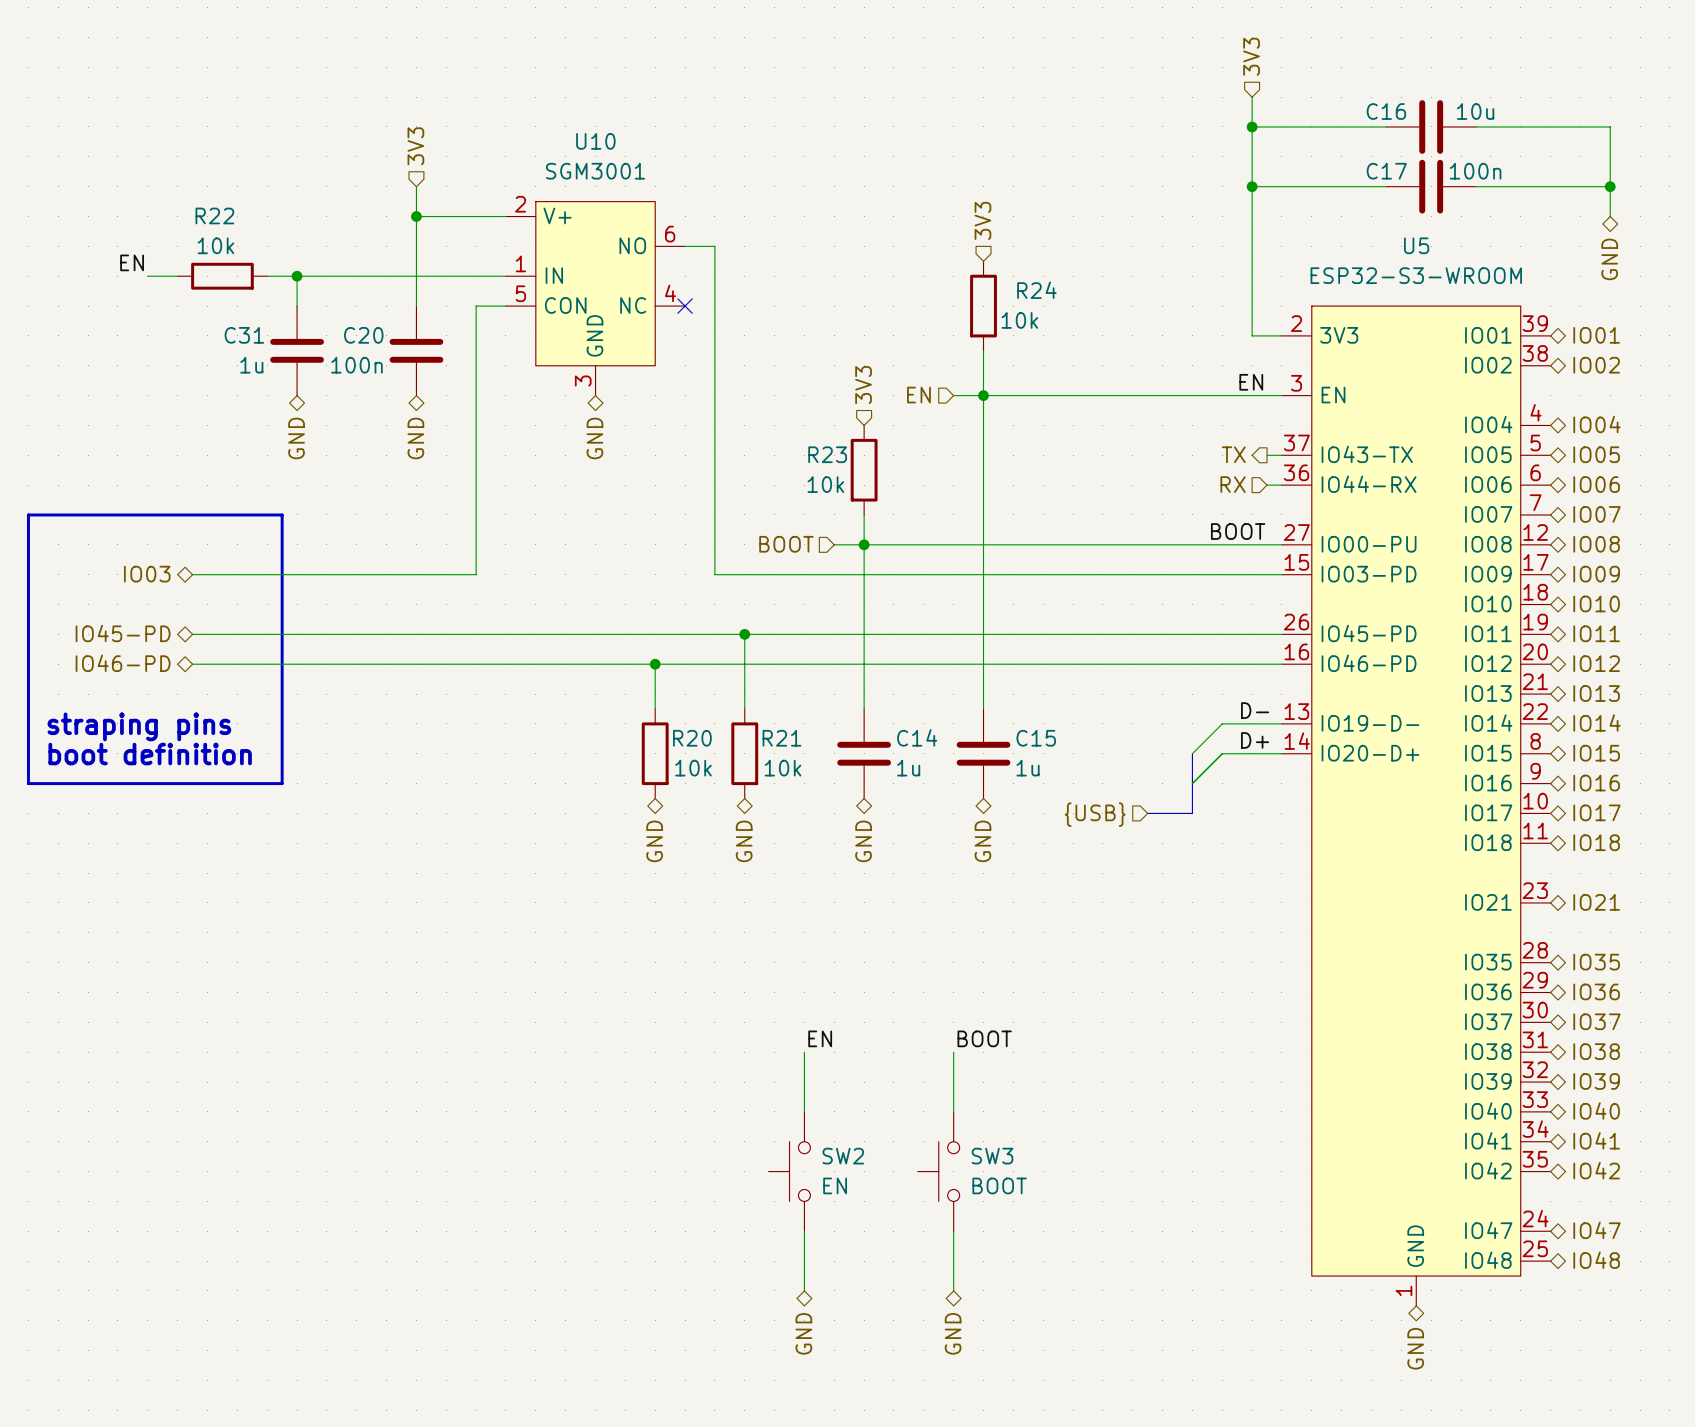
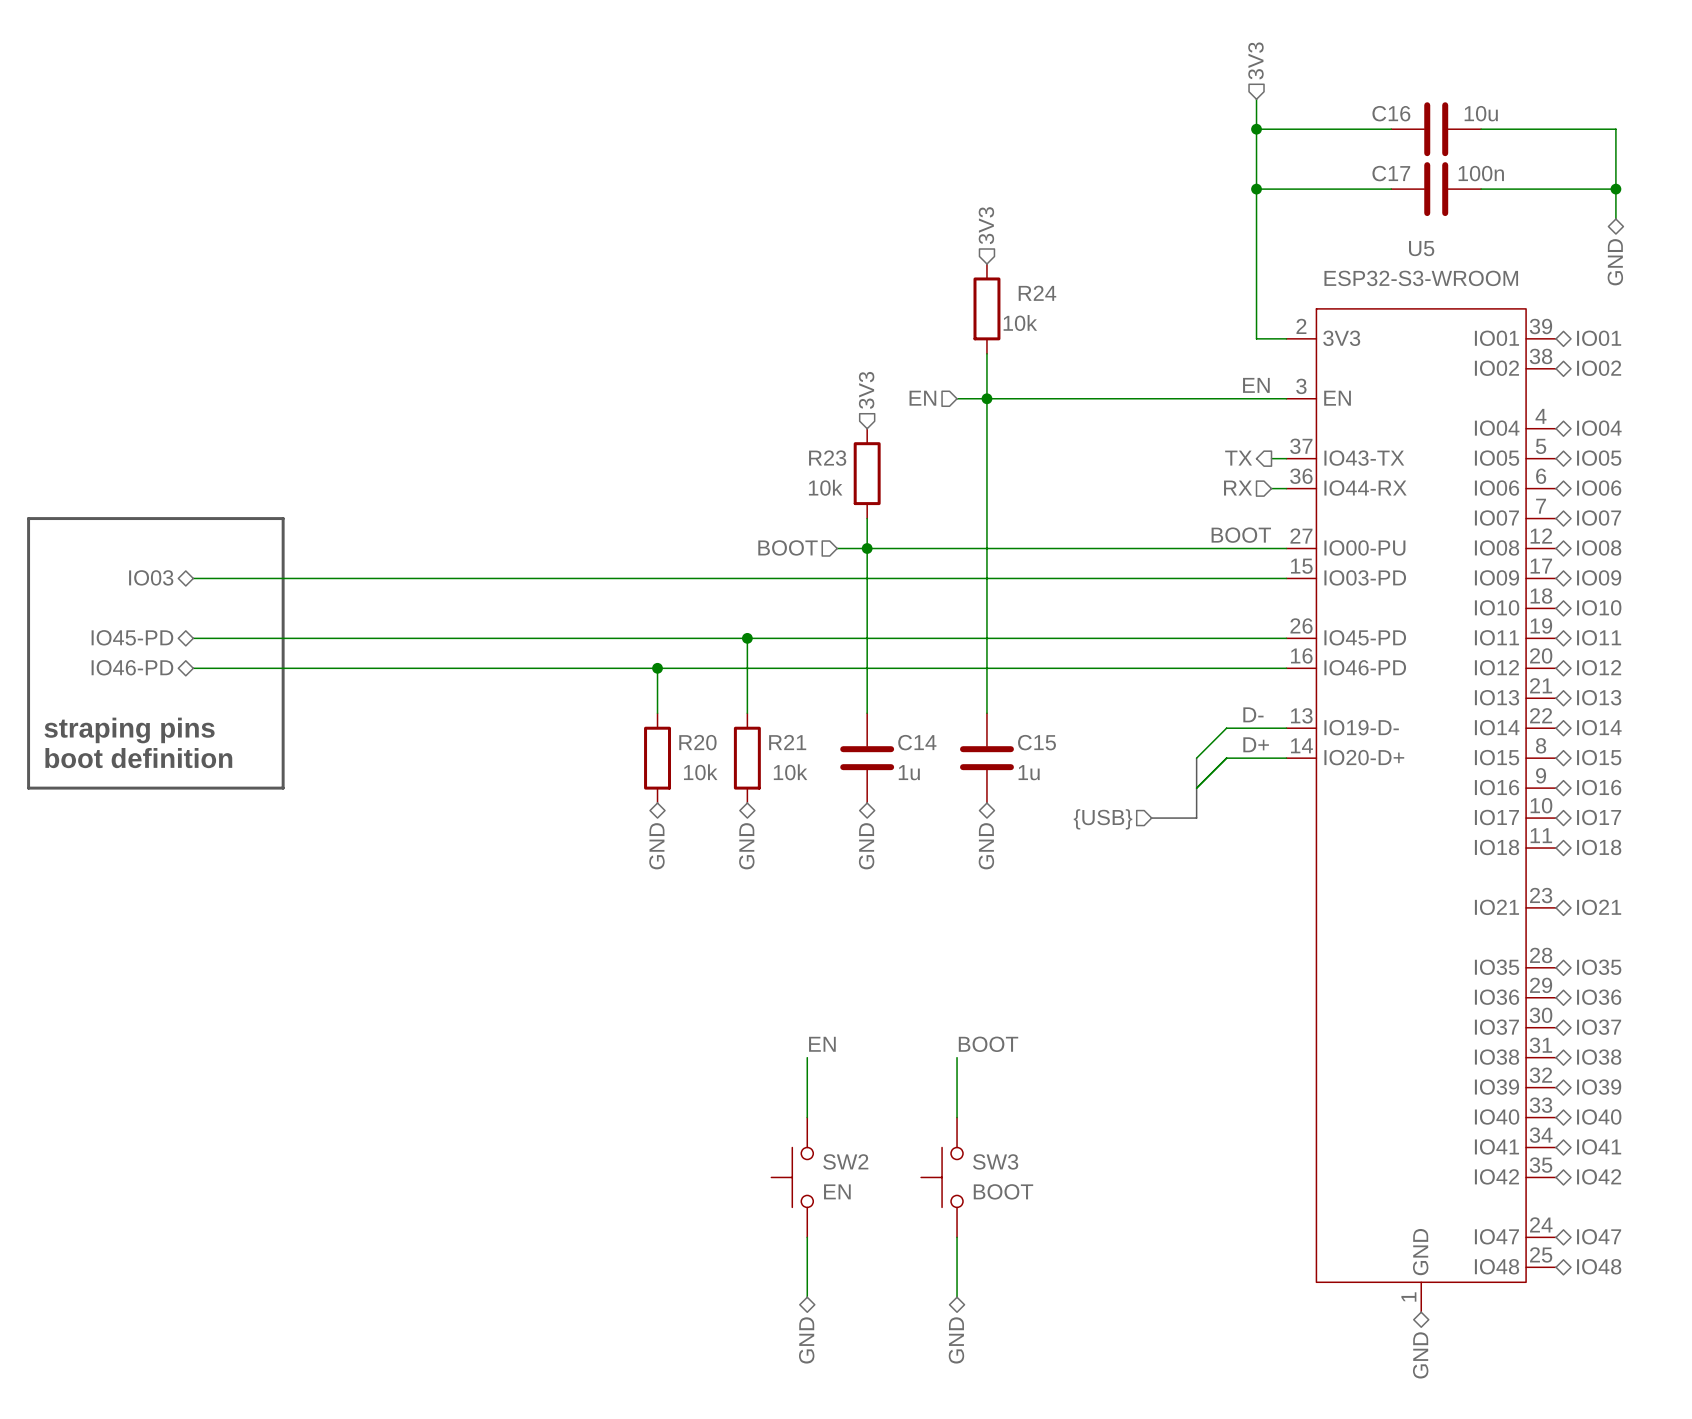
hierarchical label: 3V3 (415, 146) -> none
wire: (416, 186) (416, 306) -> none
wire: (416, 216) (505, 216) -> none
junction: (416, 216) -> none
wire: (685, 246) (714, 246) (714, 574) -> none
label: EN (132, 262) -> none
wire: (147, 276) (177, 276) -> none
R22: 10k (222, 276) -> none
wire: (267, 276) (505, 276) -> none
wire: (297, 276) (297, 306) -> none
junction: (297, 276) -> none
U10: SGM3001 (595, 298) -> none
wire: (505, 306) (476, 306) (476, 574) -> (717, 578) (477, 578)
no-connect mark: (685, 306) -> none
C31: 1u (297, 350) -> none
C20: 100n (416, 350) -> none
hierarchical label: GND (296, 438) -> none
hierarchical label: GND (415, 438) -> none
hierarchical label: GND (594, 438) -> none

